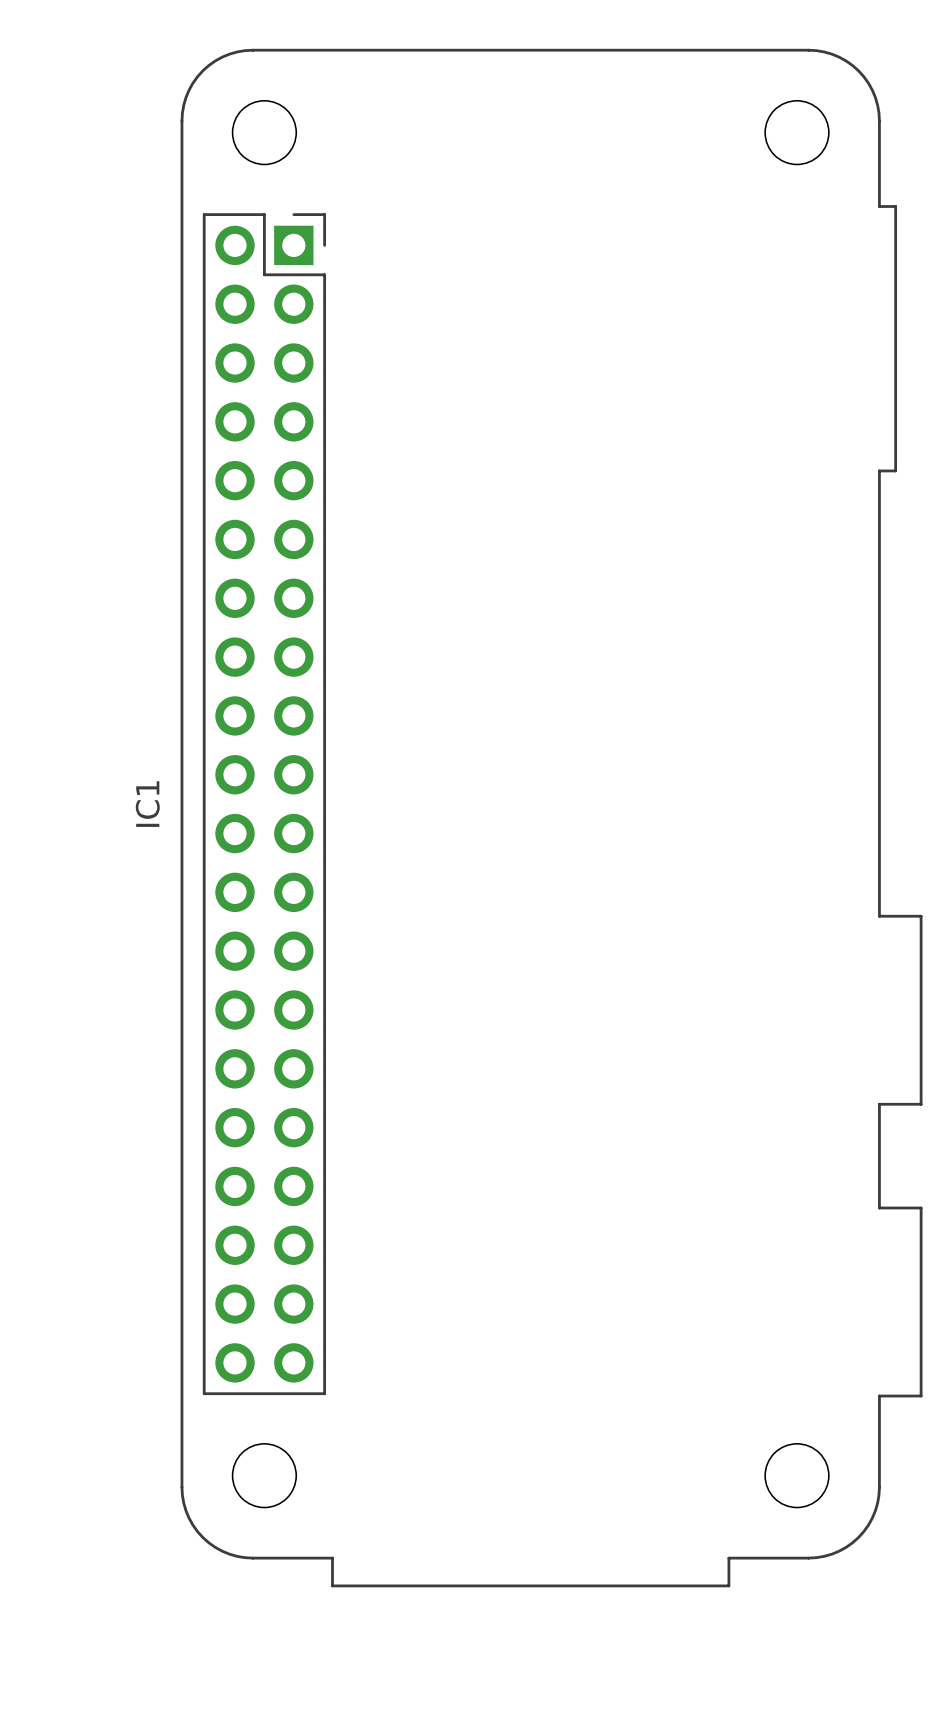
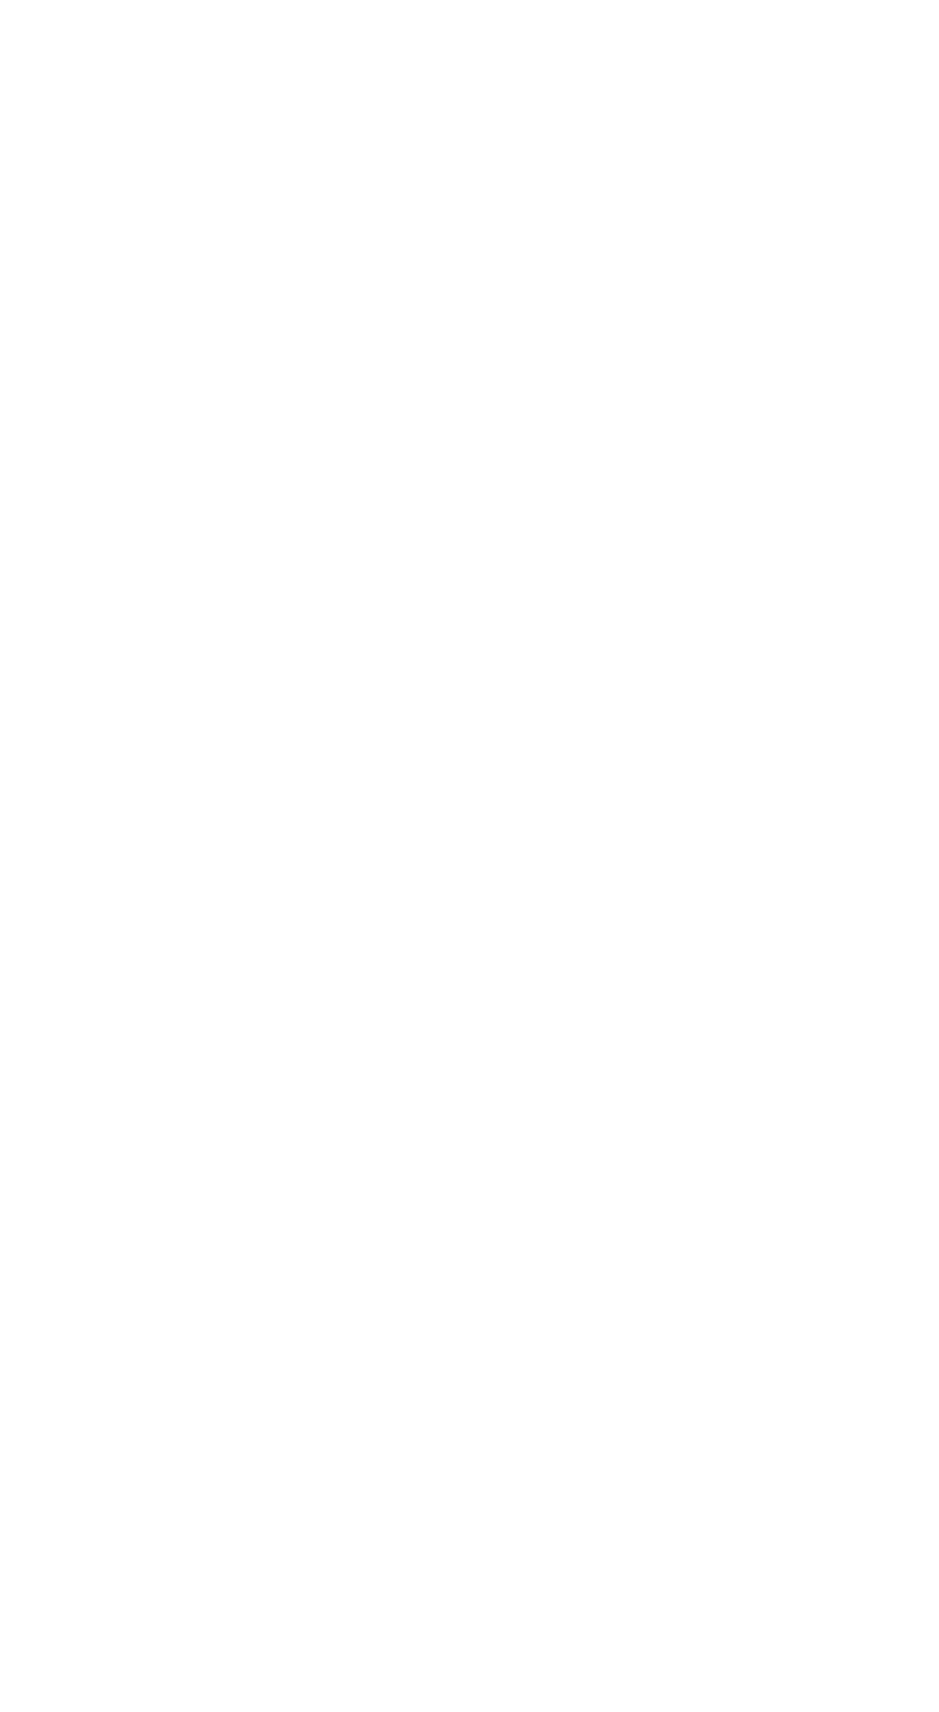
IC1: (551, 818) -> none

